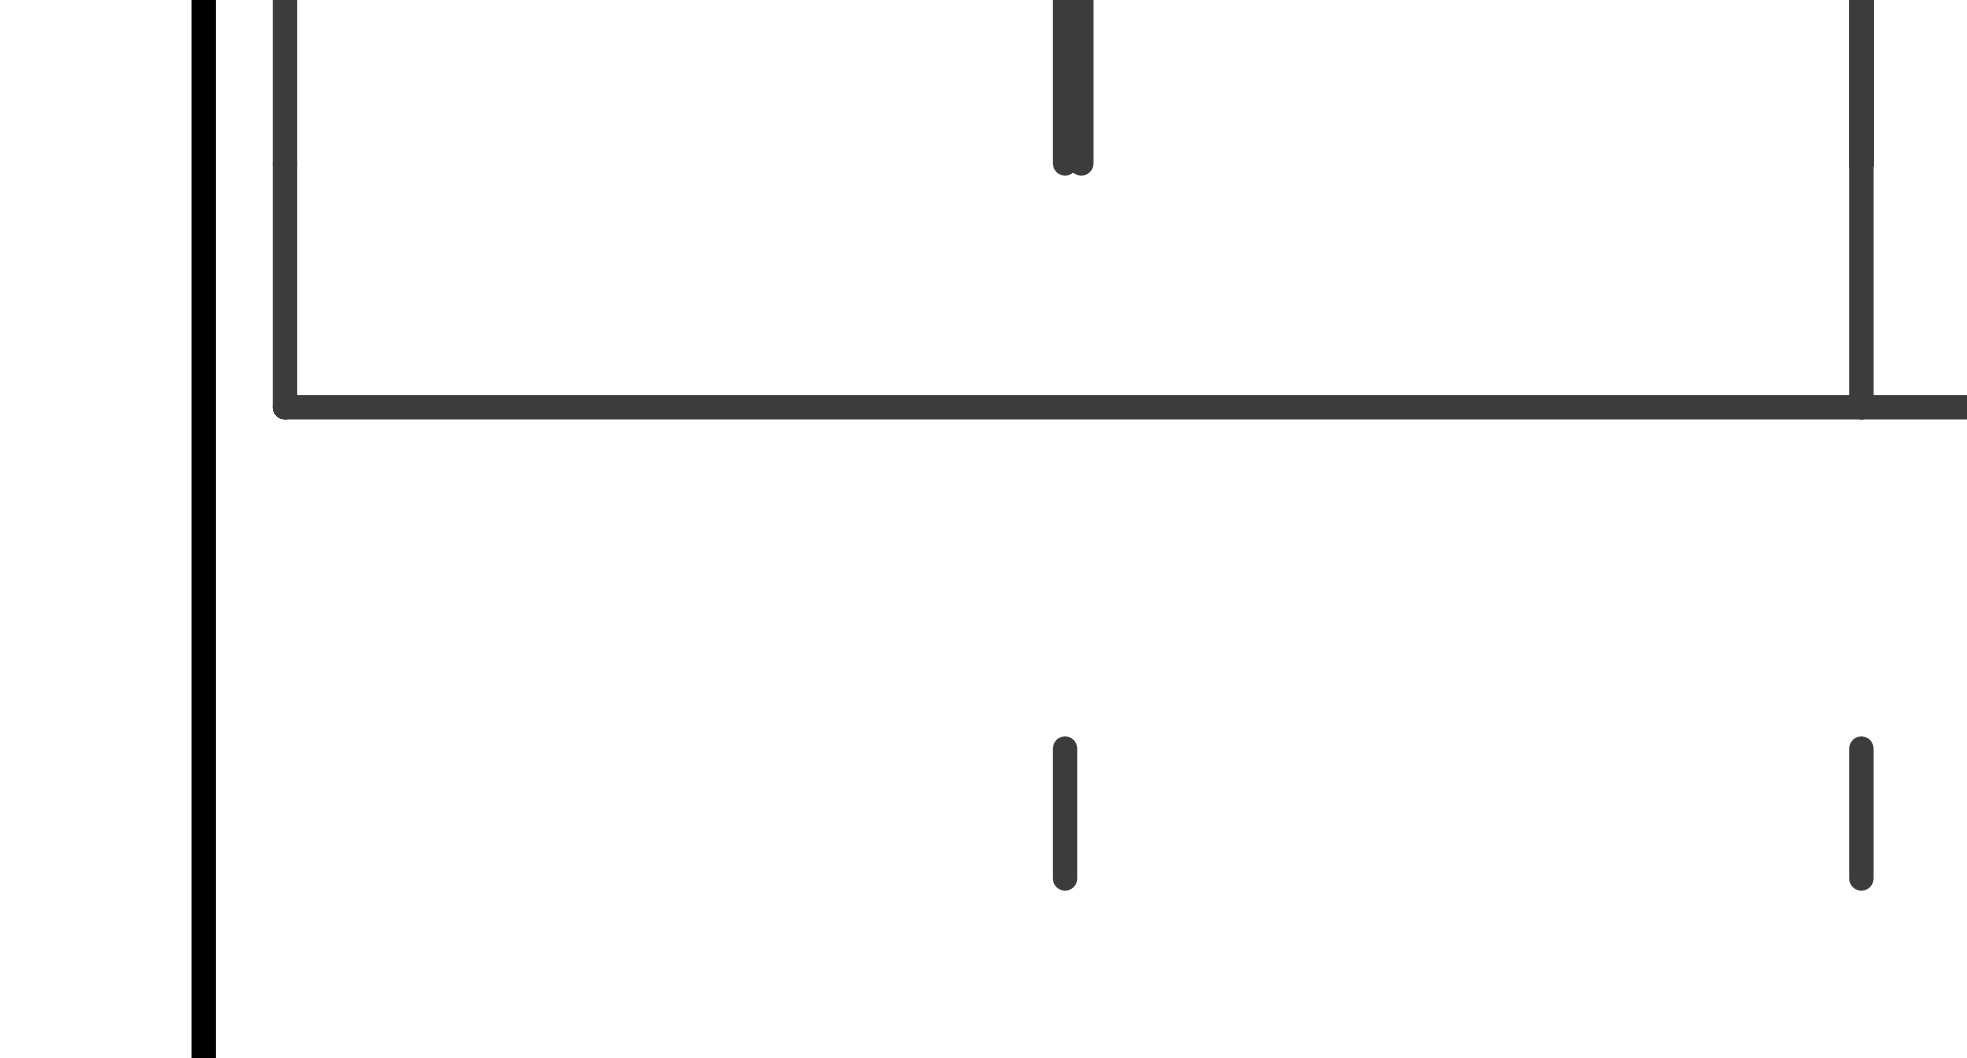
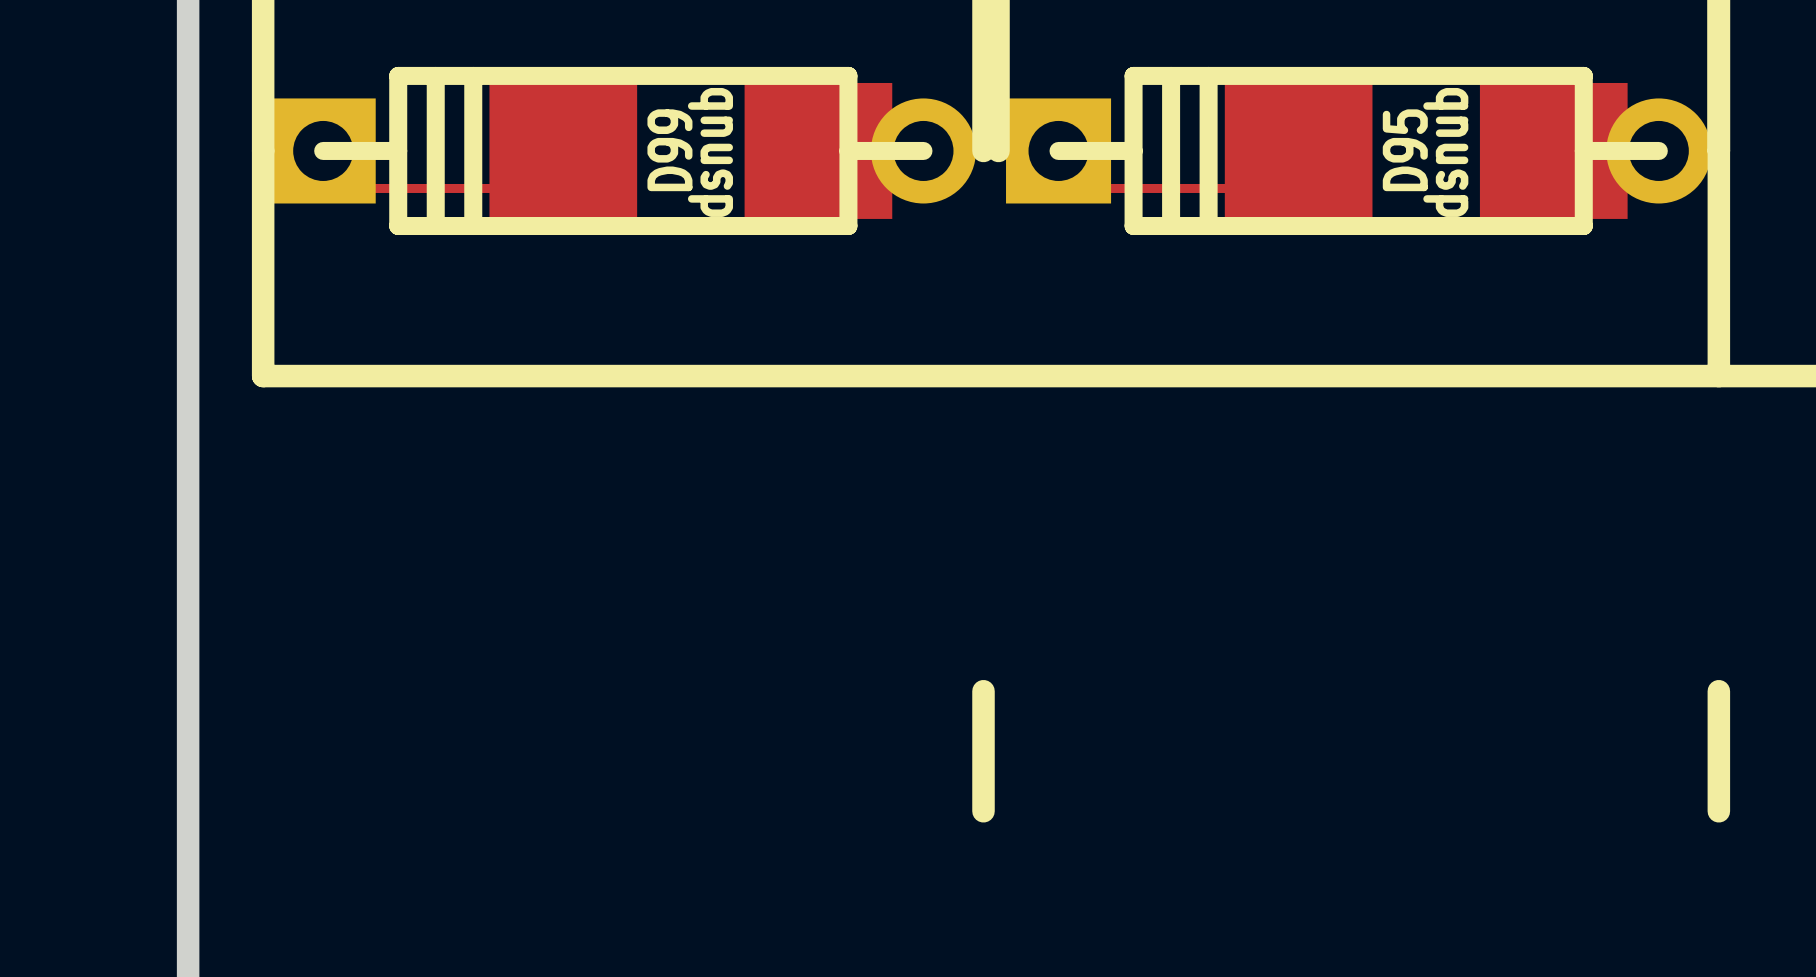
D99: none -> dsnub (623, 150)
D95: none -> dsnub (1358, 150)

